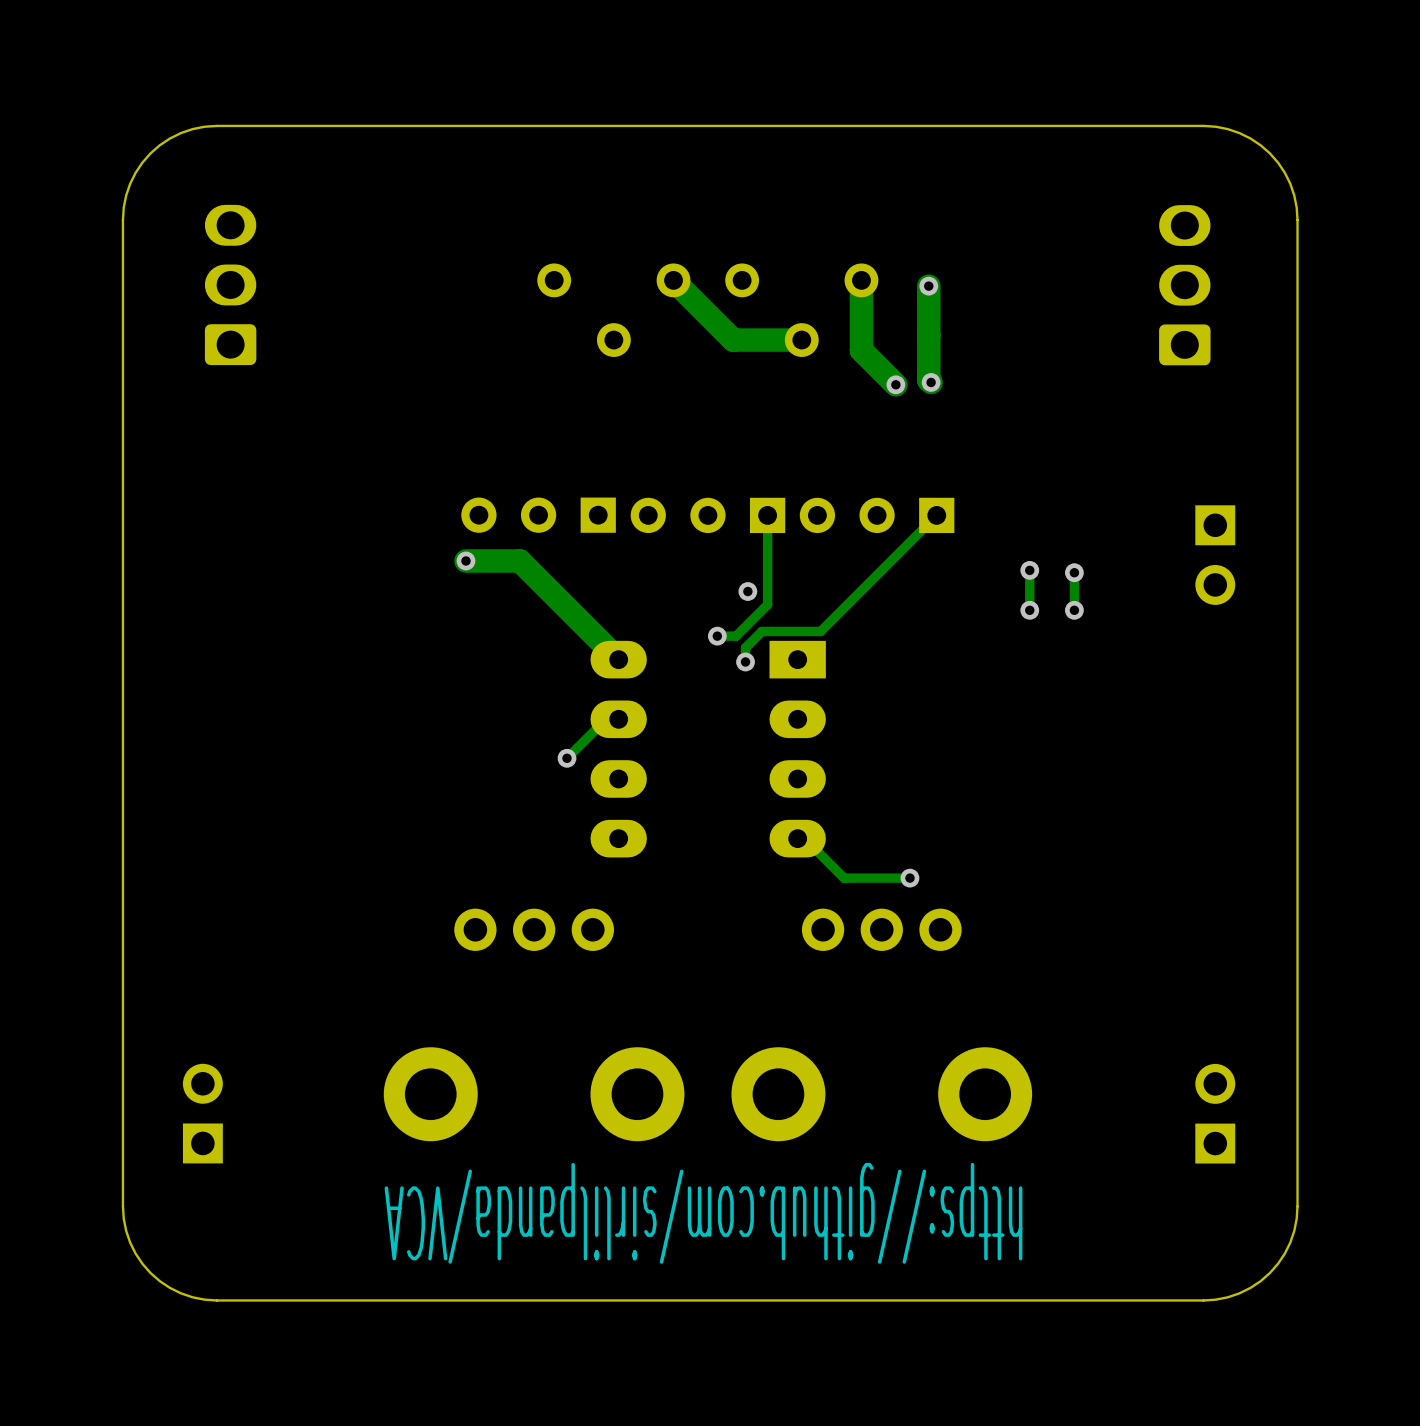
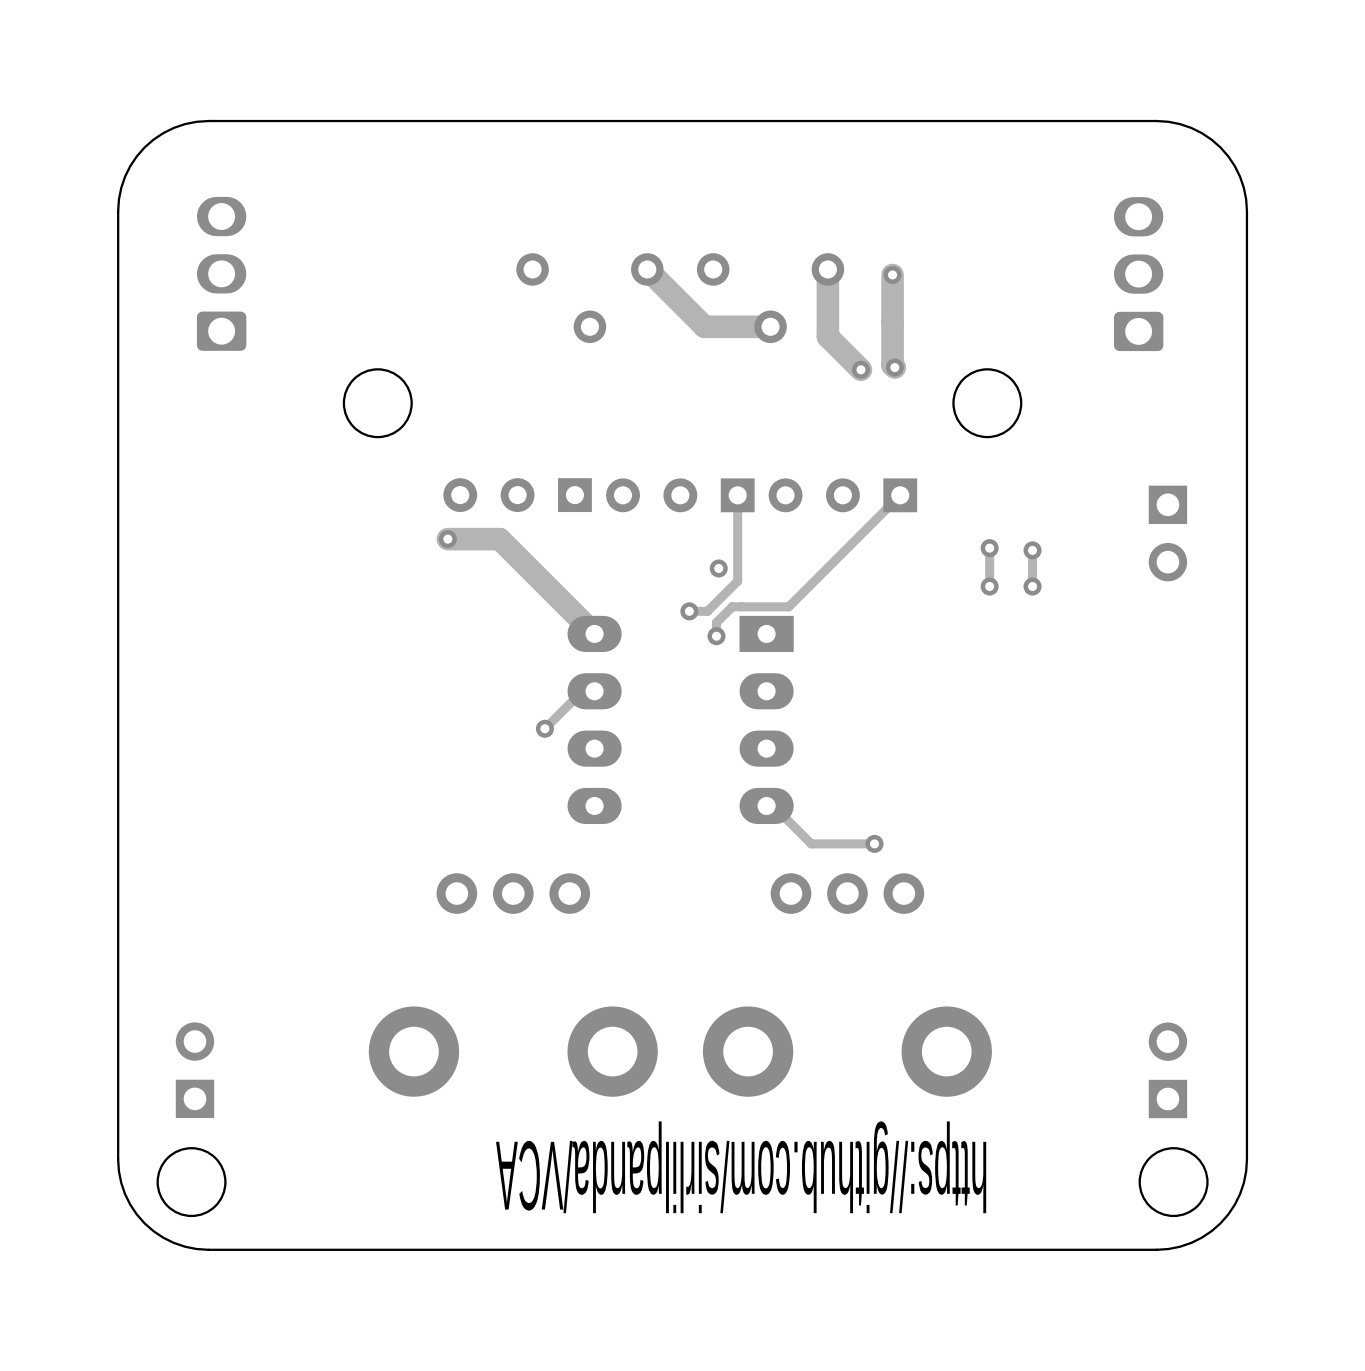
round board edge: none -> [342, 368, 413, 439]
round board edge: none -> [952, 368, 1023, 439]
round board edge: none -> [156, 1147, 227, 1218]
round board edge: none -> [1138, 1147, 1209, 1218]

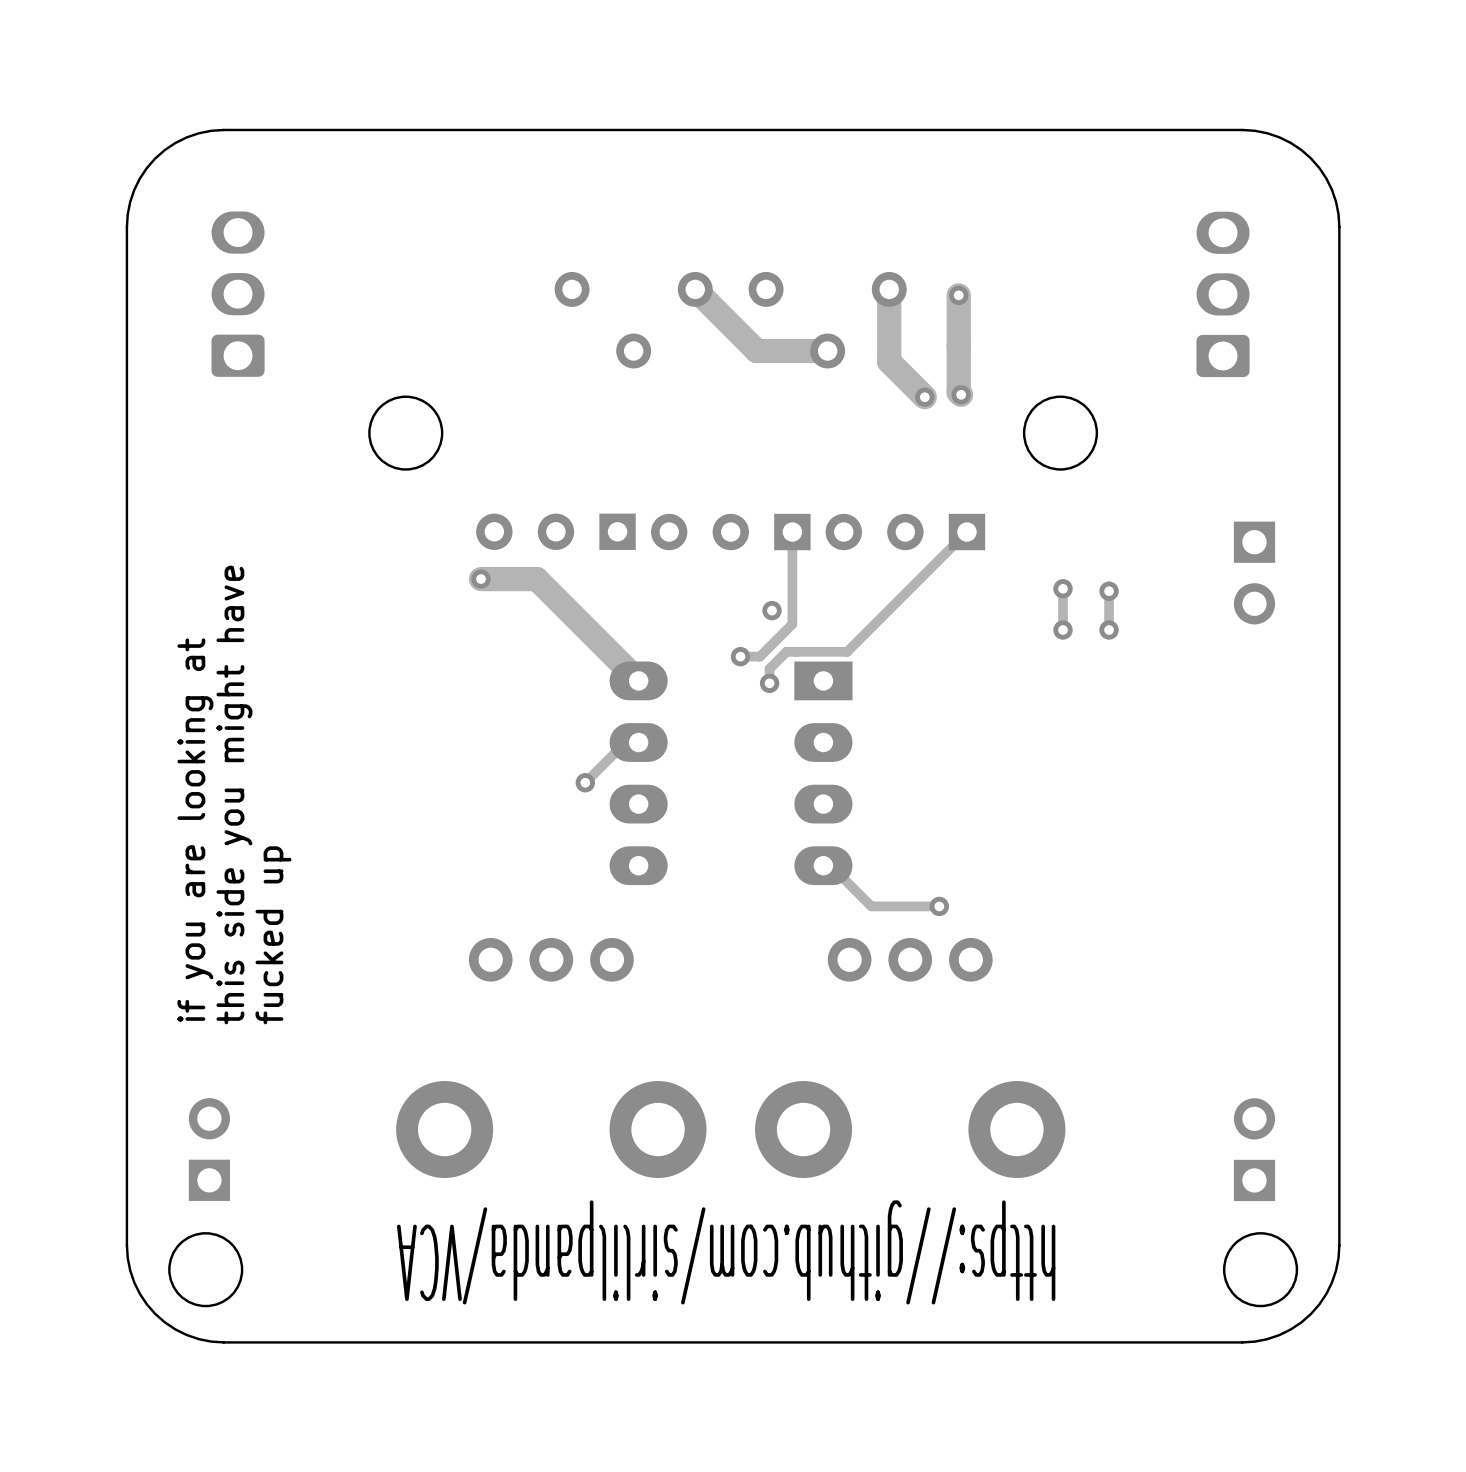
text: none -> this side you might have (234, 795)
text: none -> if you are looking at (195, 830)
text: none -> fucked up (273, 935)

